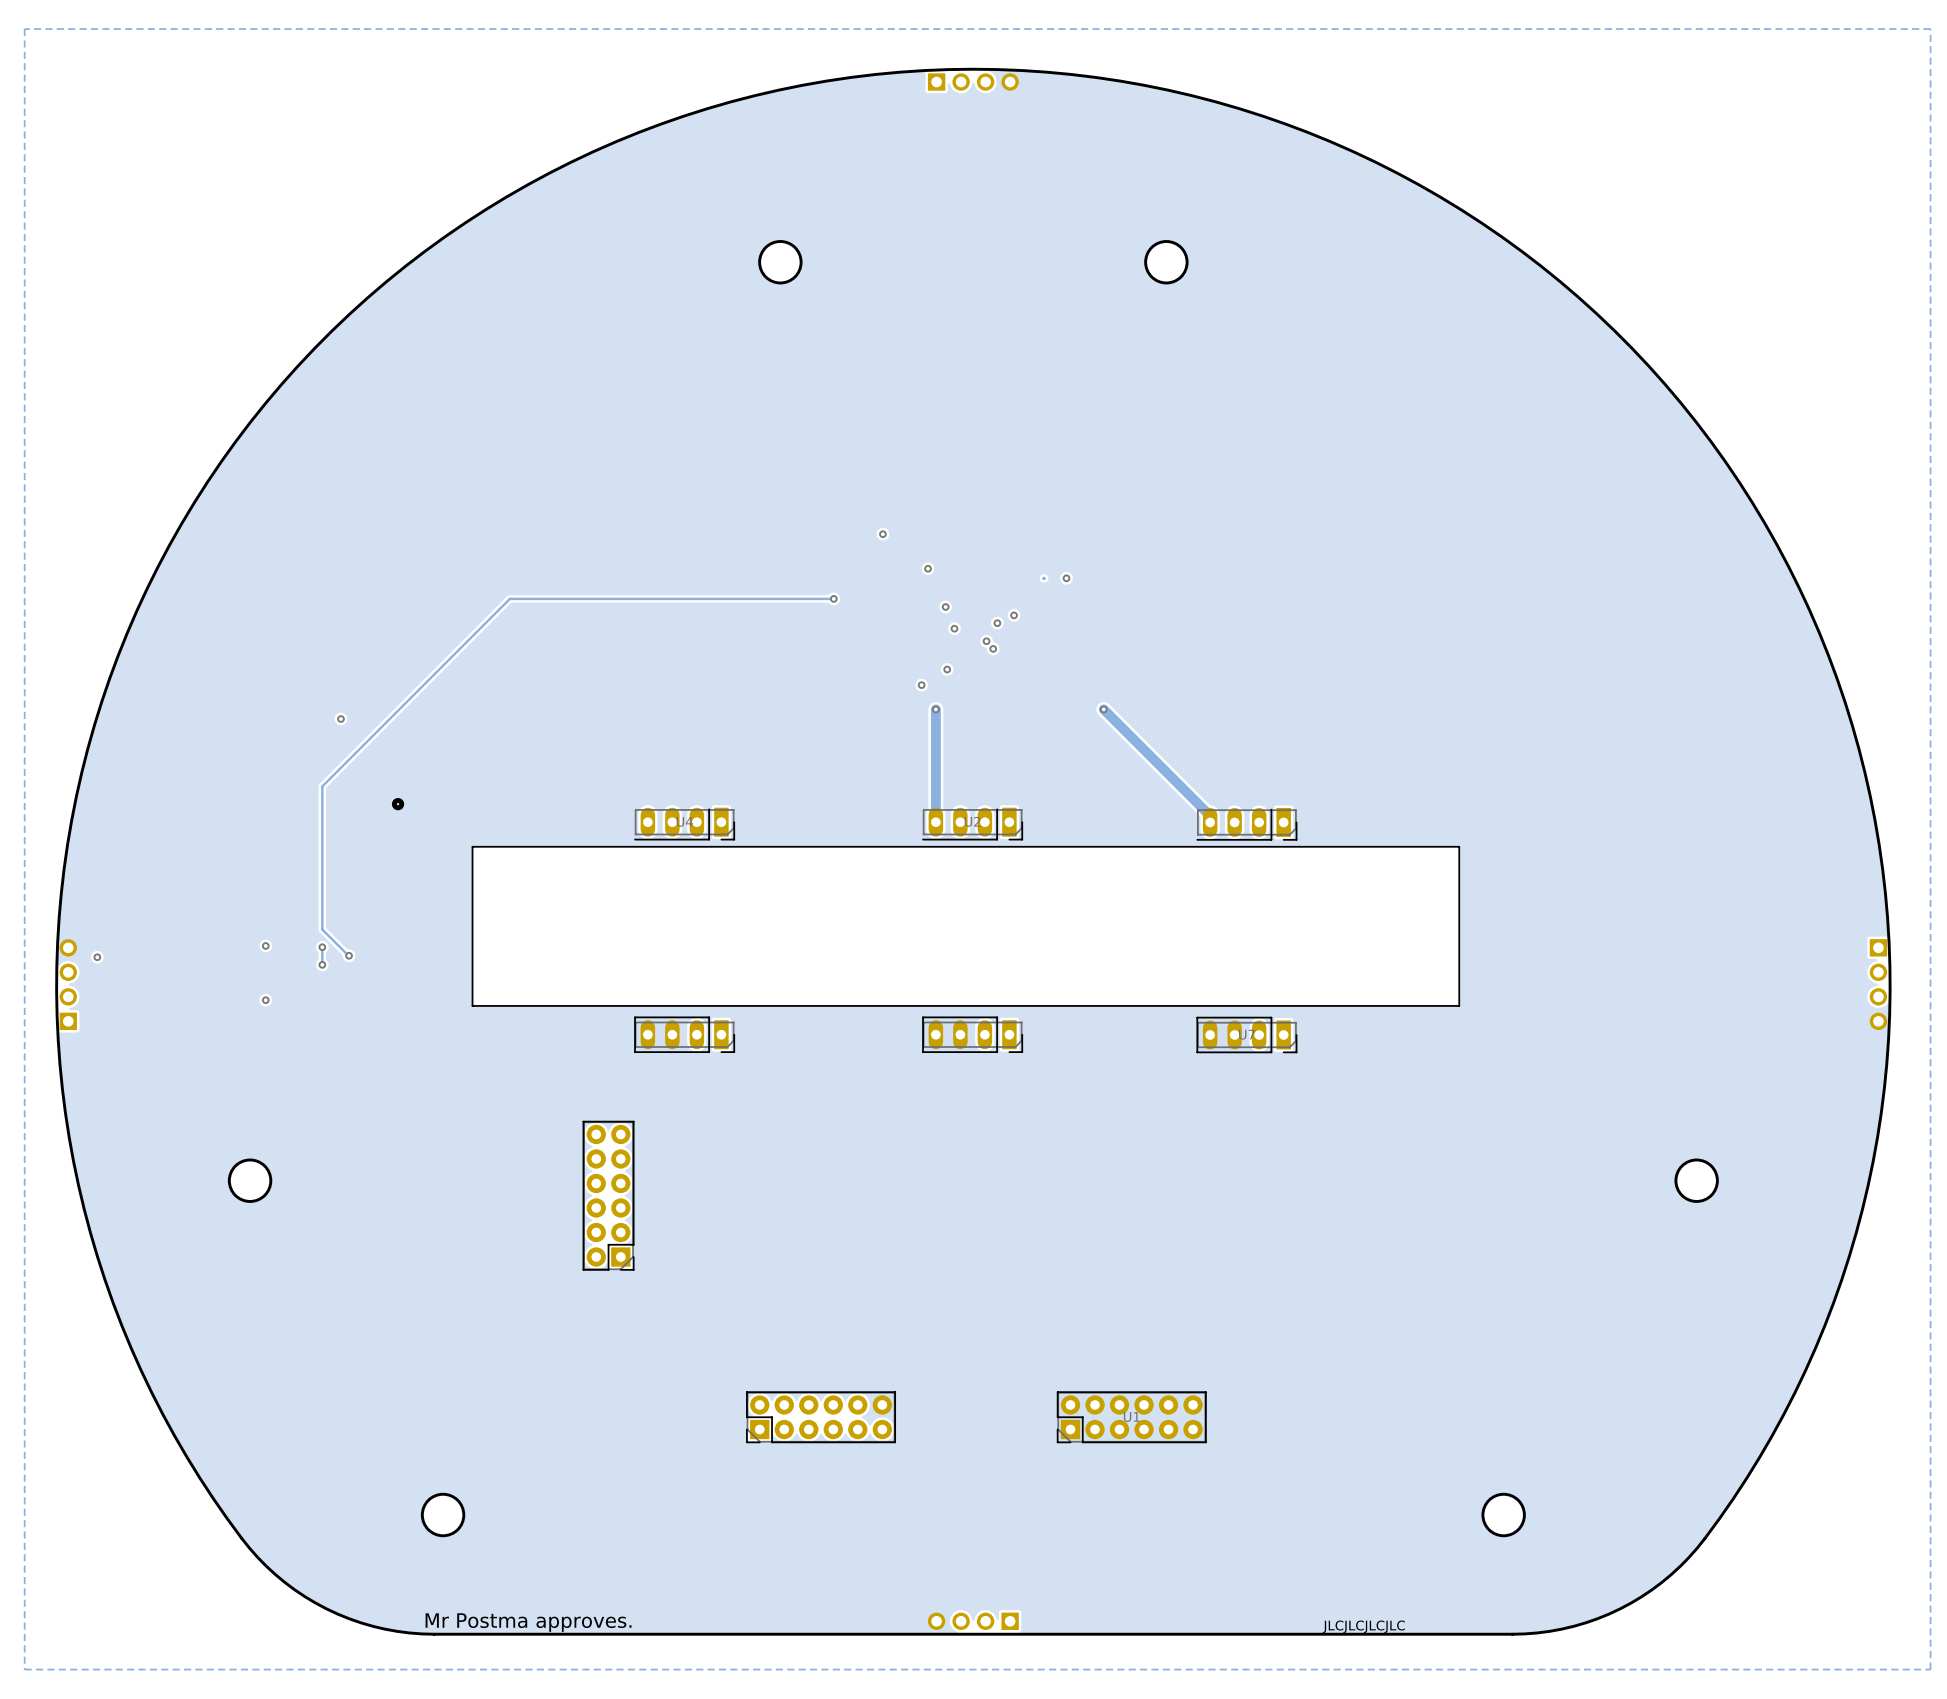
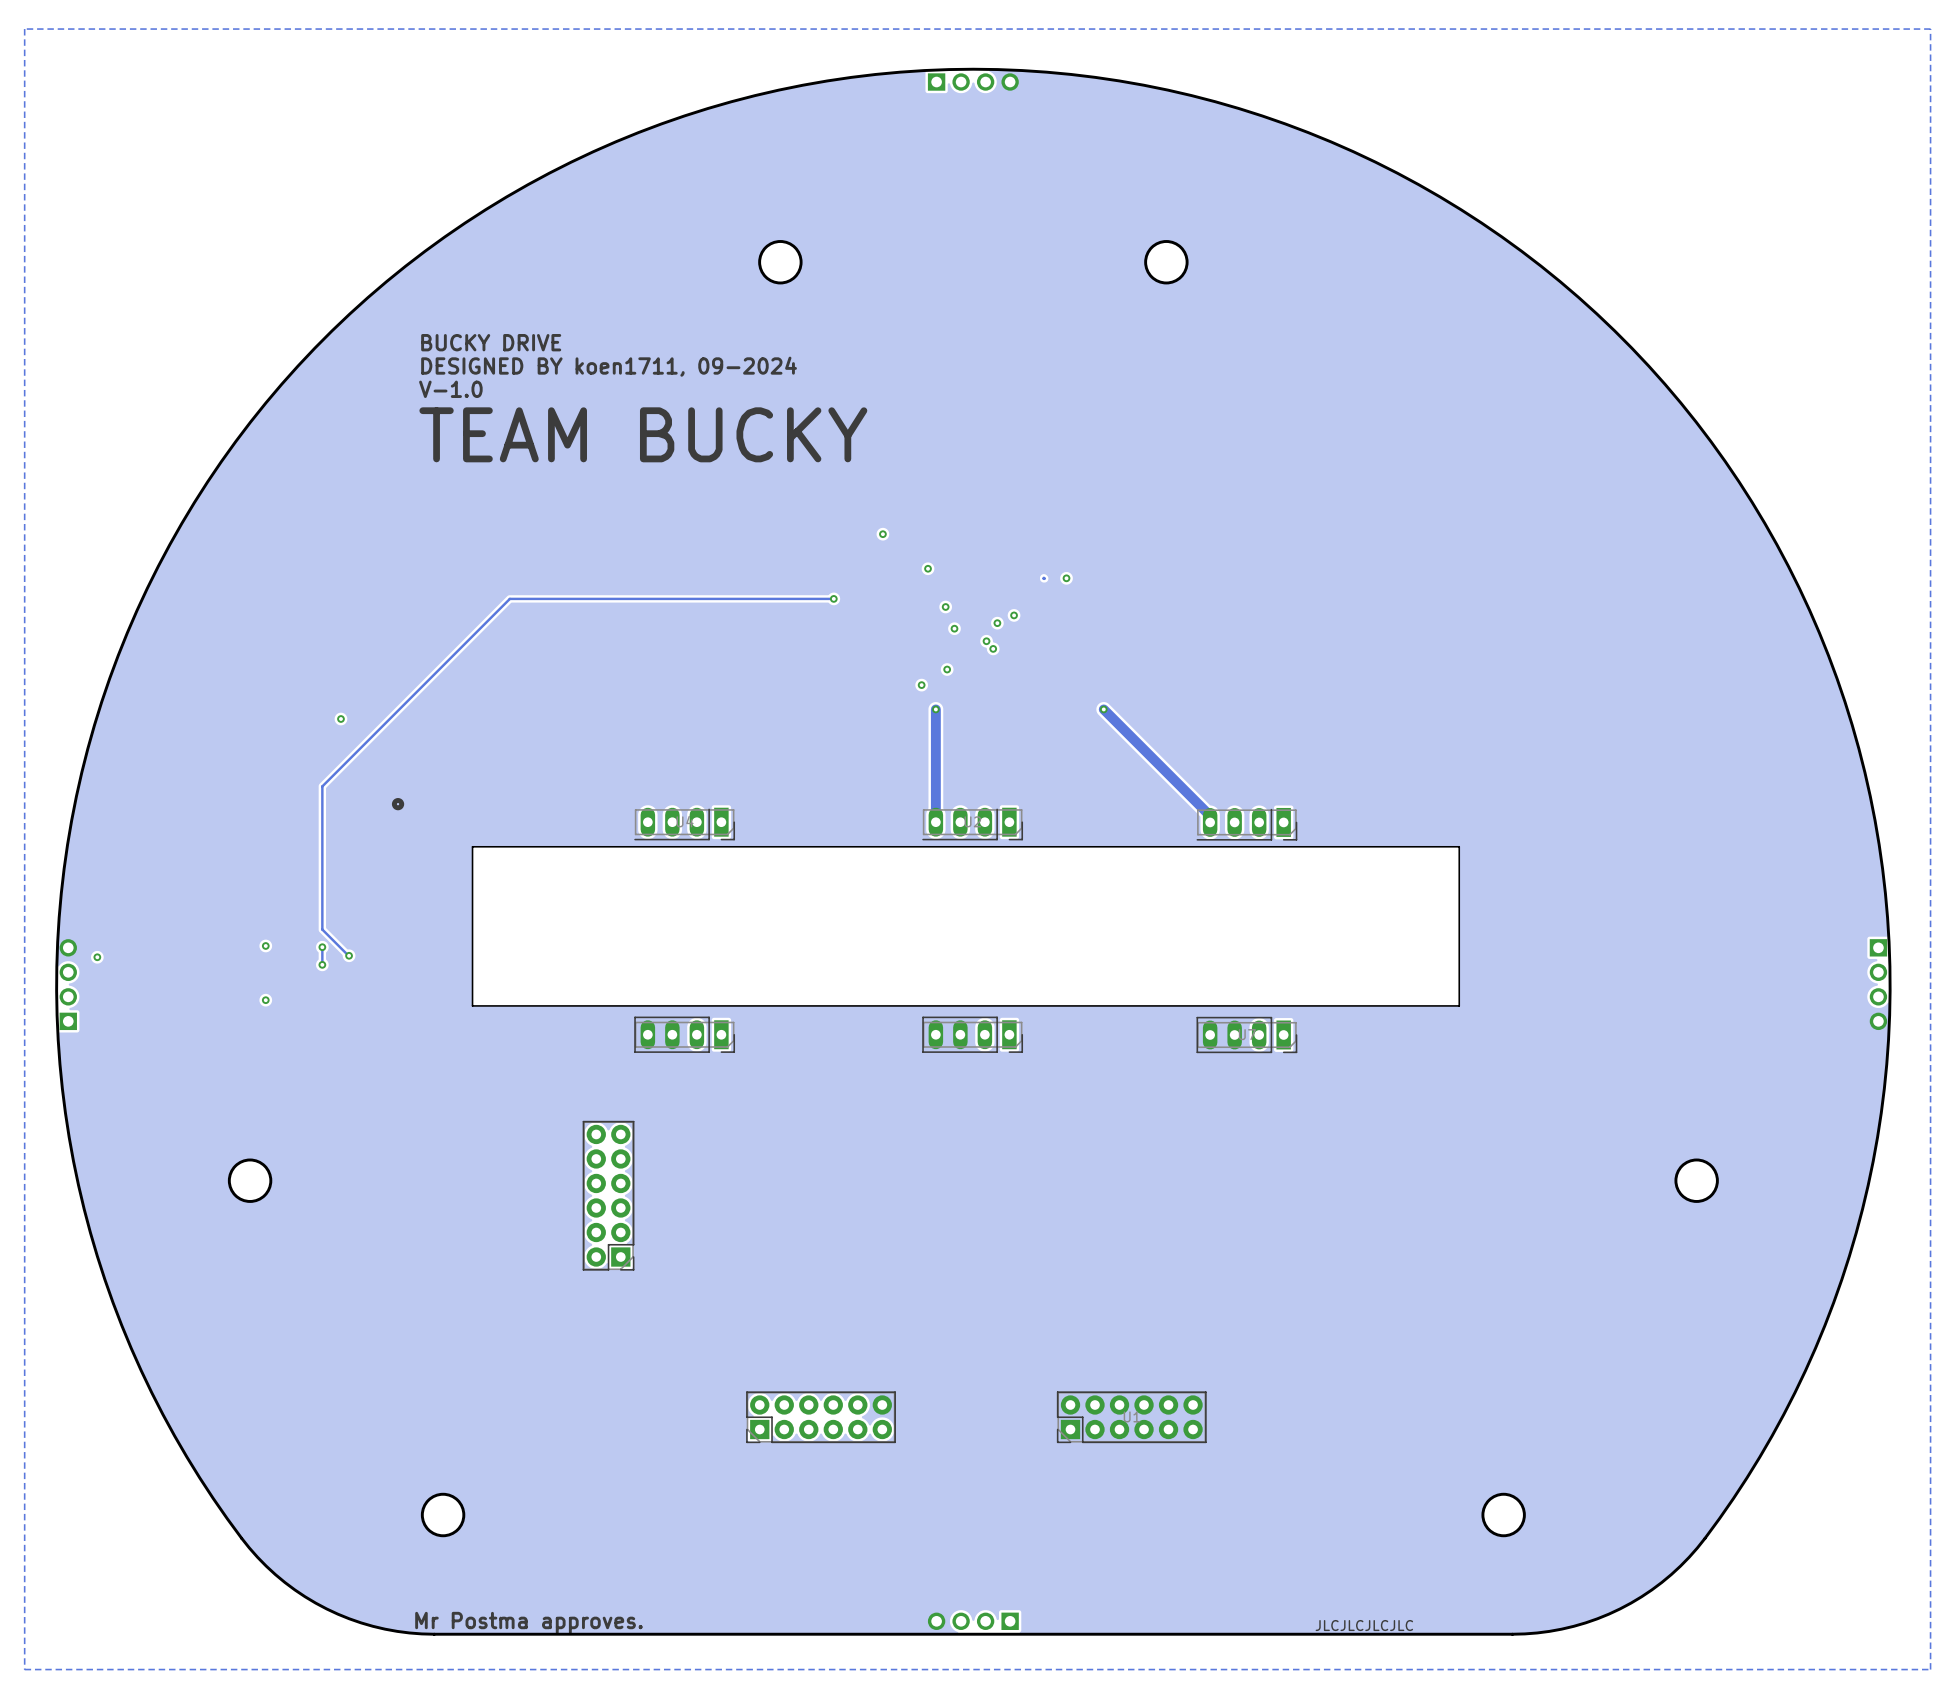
text: none -> BUCKY DRIVE (491, 342)
text: none -> DESIGNED BY koen1711, 09-2024 (609, 366)
text: none -> V-1.0 (450, 389)
text: none -> TEAM BUCKY (643, 434)

